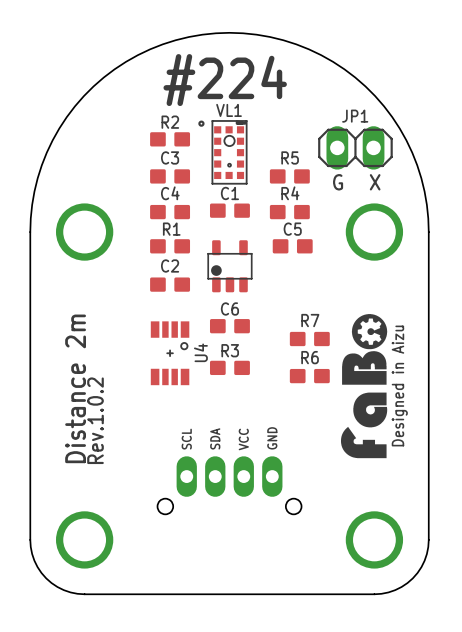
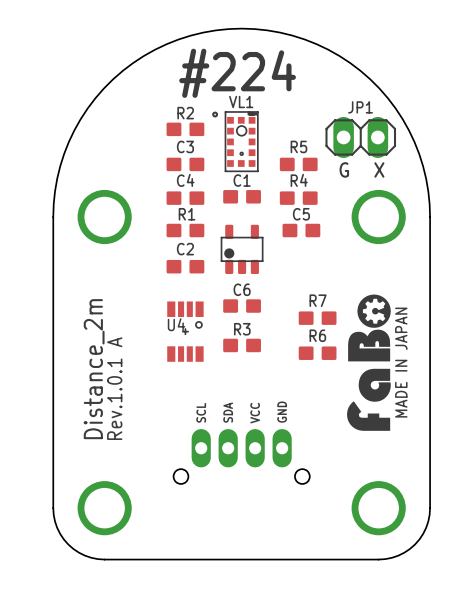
U4 name rotation: 0° (200, 352) -> 90° clockwise (176, 324)
U4 name position: U4 (200, 352) -> U4 (176, 324)
text: Designed in Aizu (399, 385) -> MADE IN JAPAN (401, 362)
text: Distance 2m (75, 388) -> Distance_2m (94, 369)
text: Rev.1.0.2 (95, 420) -> Rev.1.0.1 A (114, 388)

